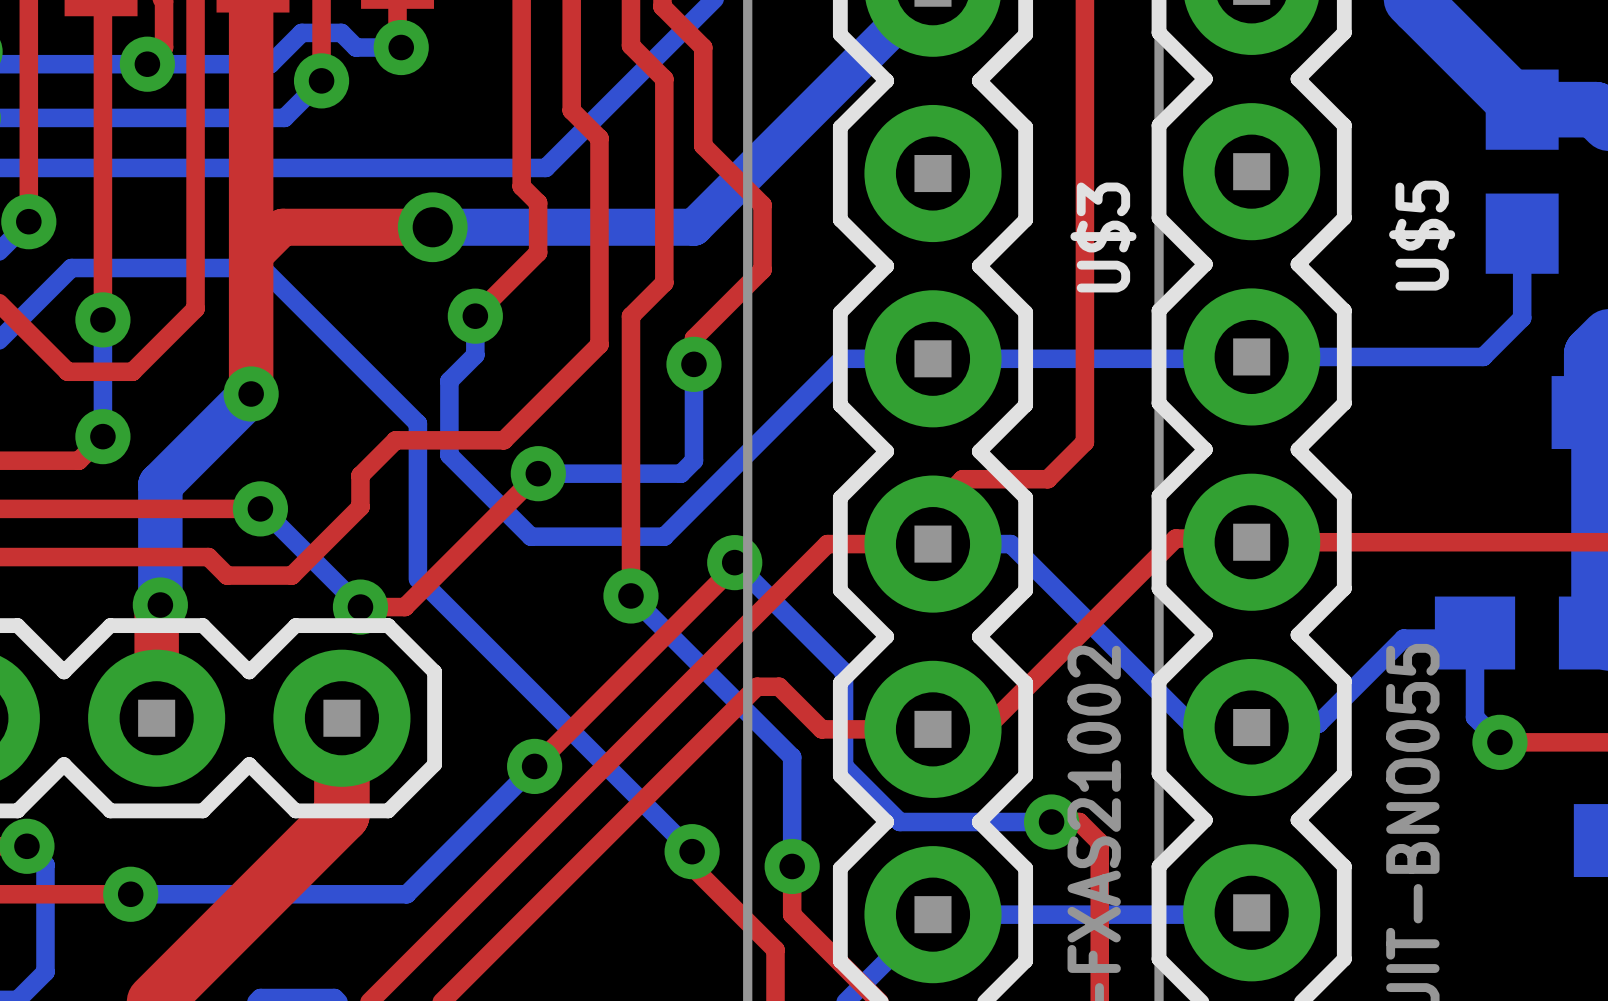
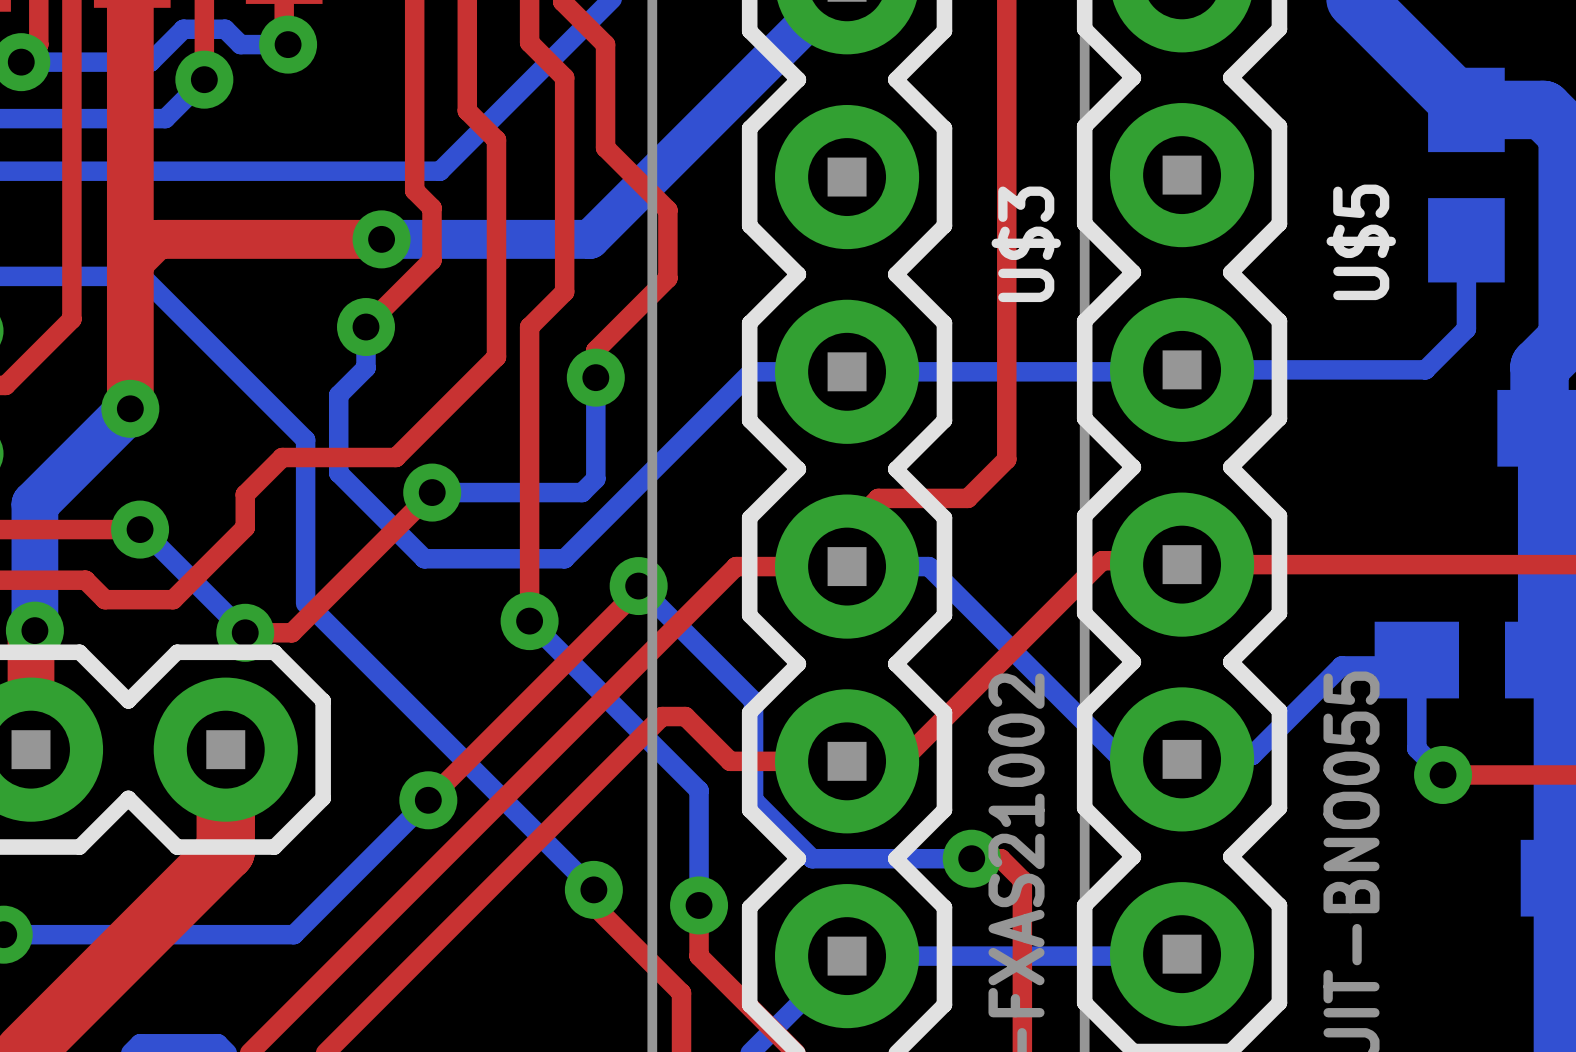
top track: (432, 227) (282, 227) (277, 232) -> (381, 239) (157, 239)
bottom track: (432, 227) (693, 227) -> (381, 239) (589, 239) (595, 233)
via position: (432, 227) -> (381, 239)

